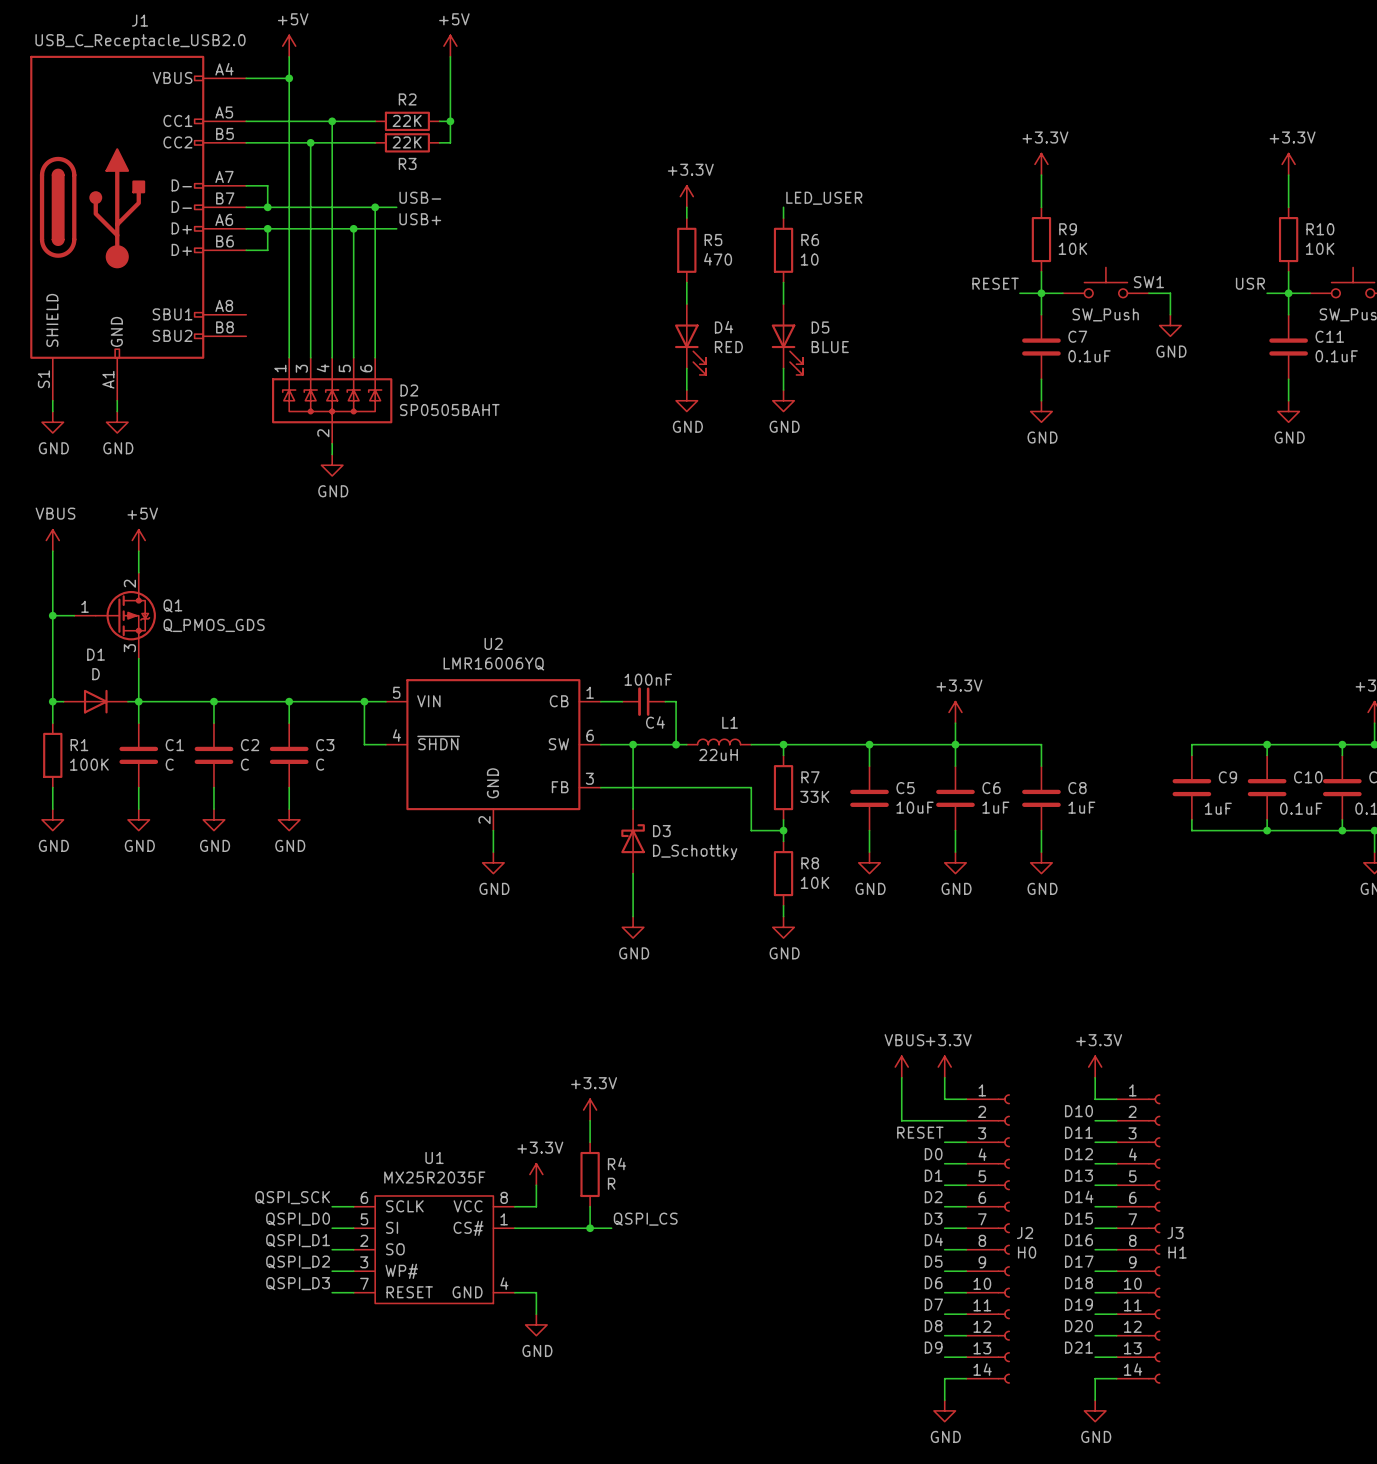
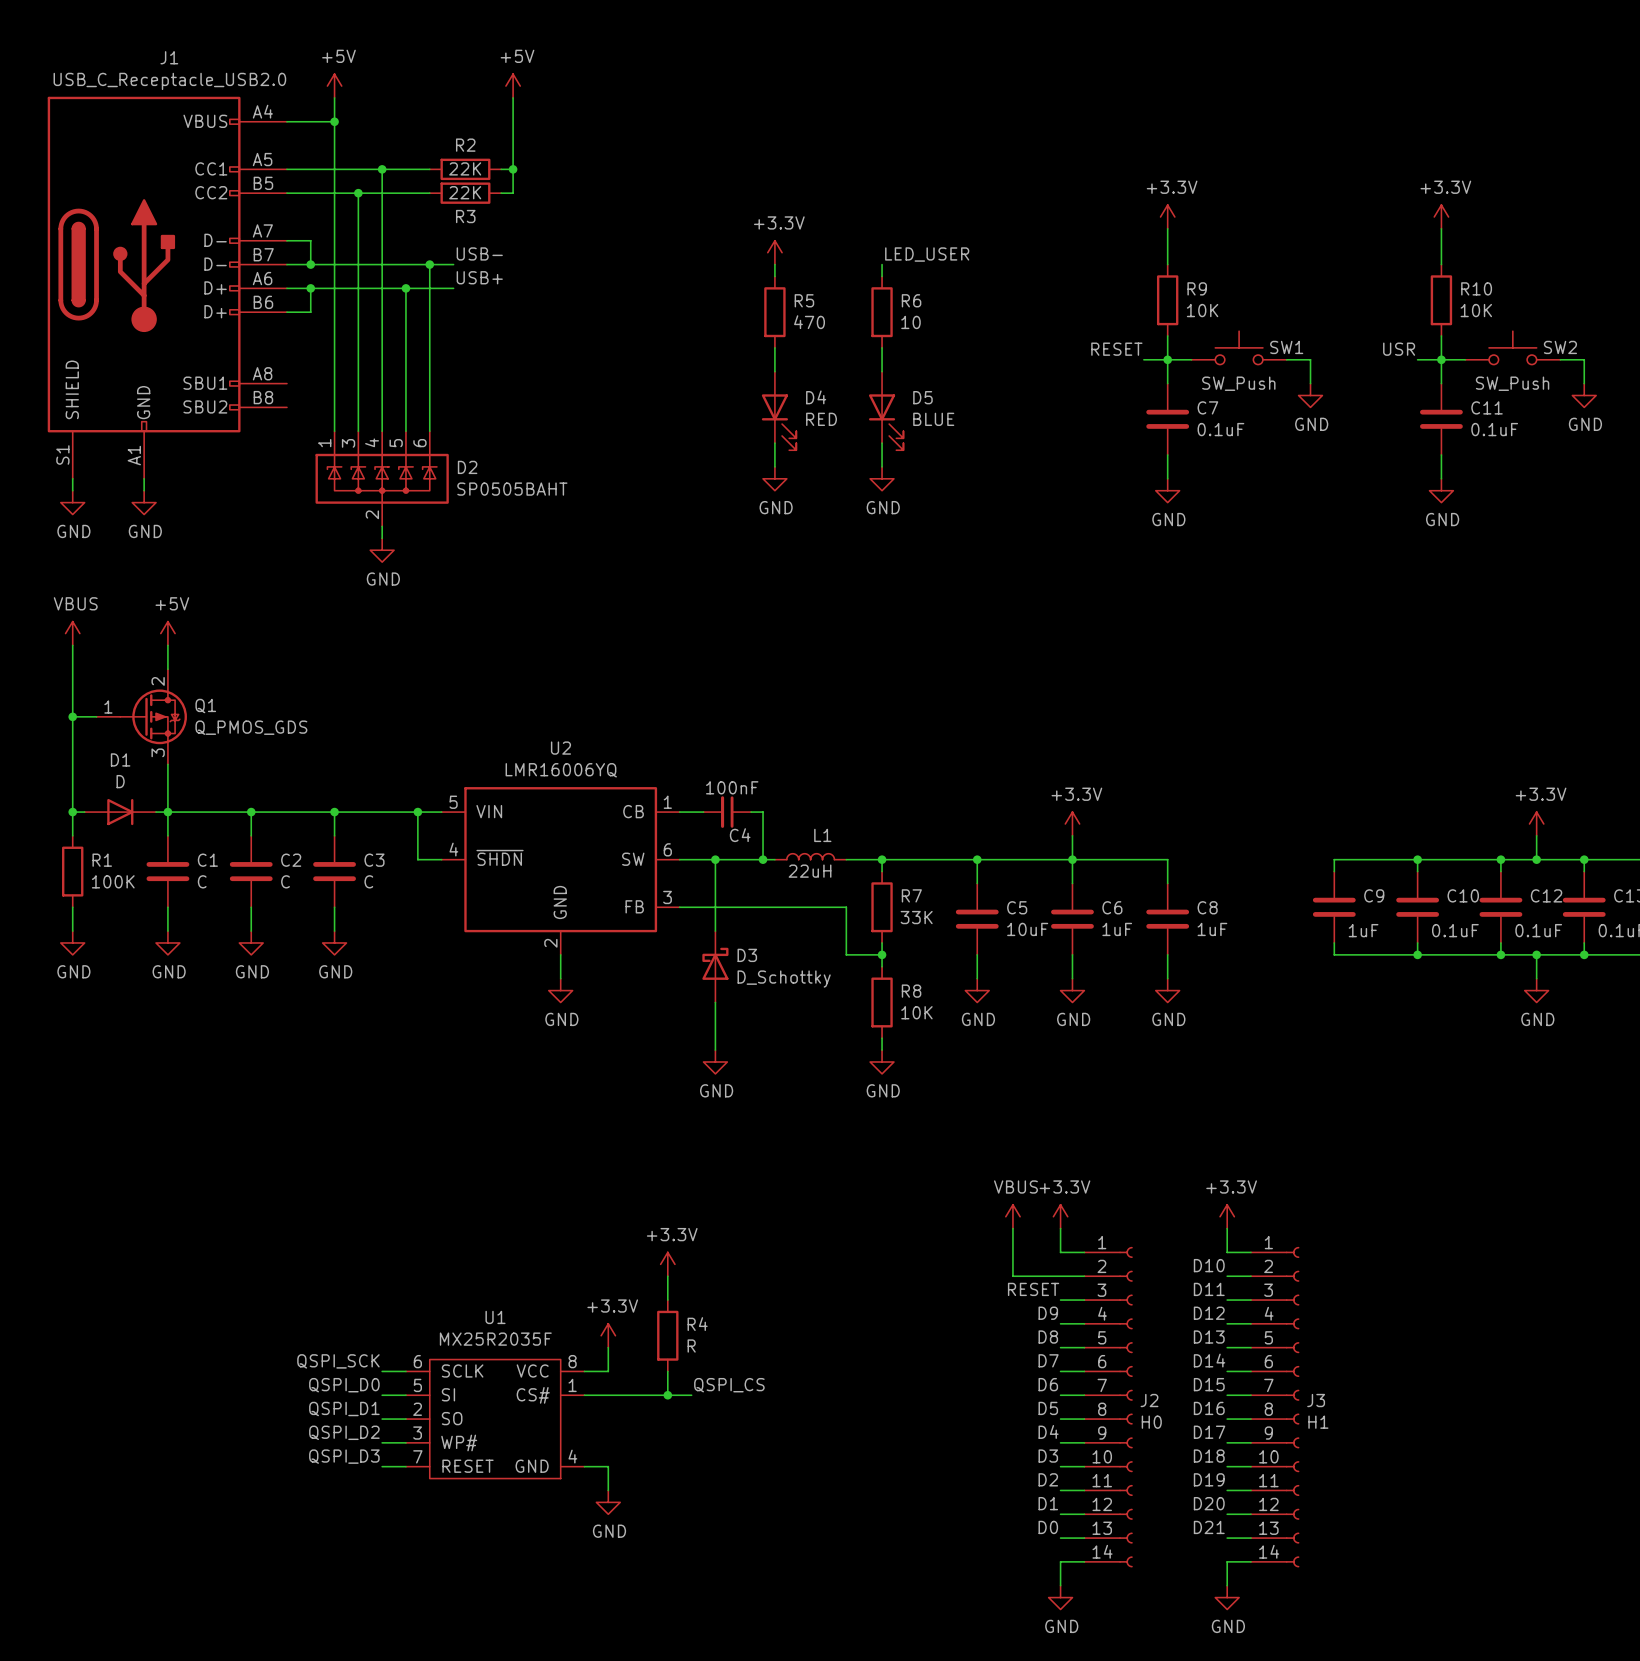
label: D0 (933, 1154) -> D9 (1048, 1313)
label: D1 (933, 1175) -> D8 (1048, 1337)
label: D2 (933, 1197) -> D7 (1048, 1360)
label: D3 (933, 1218) -> D6 (1048, 1384)
label: D4 (933, 1239) -> D5 (1048, 1408)
label: D5 (933, 1261) -> D4 (1048, 1431)
label: D6 (933, 1283) -> D3 (1048, 1456)
label: D7 (933, 1304) -> D2 (1048, 1479)
label: D8 (933, 1326) -> D1 (1048, 1503)
label: D9 (933, 1347) -> D0 (1048, 1527)

